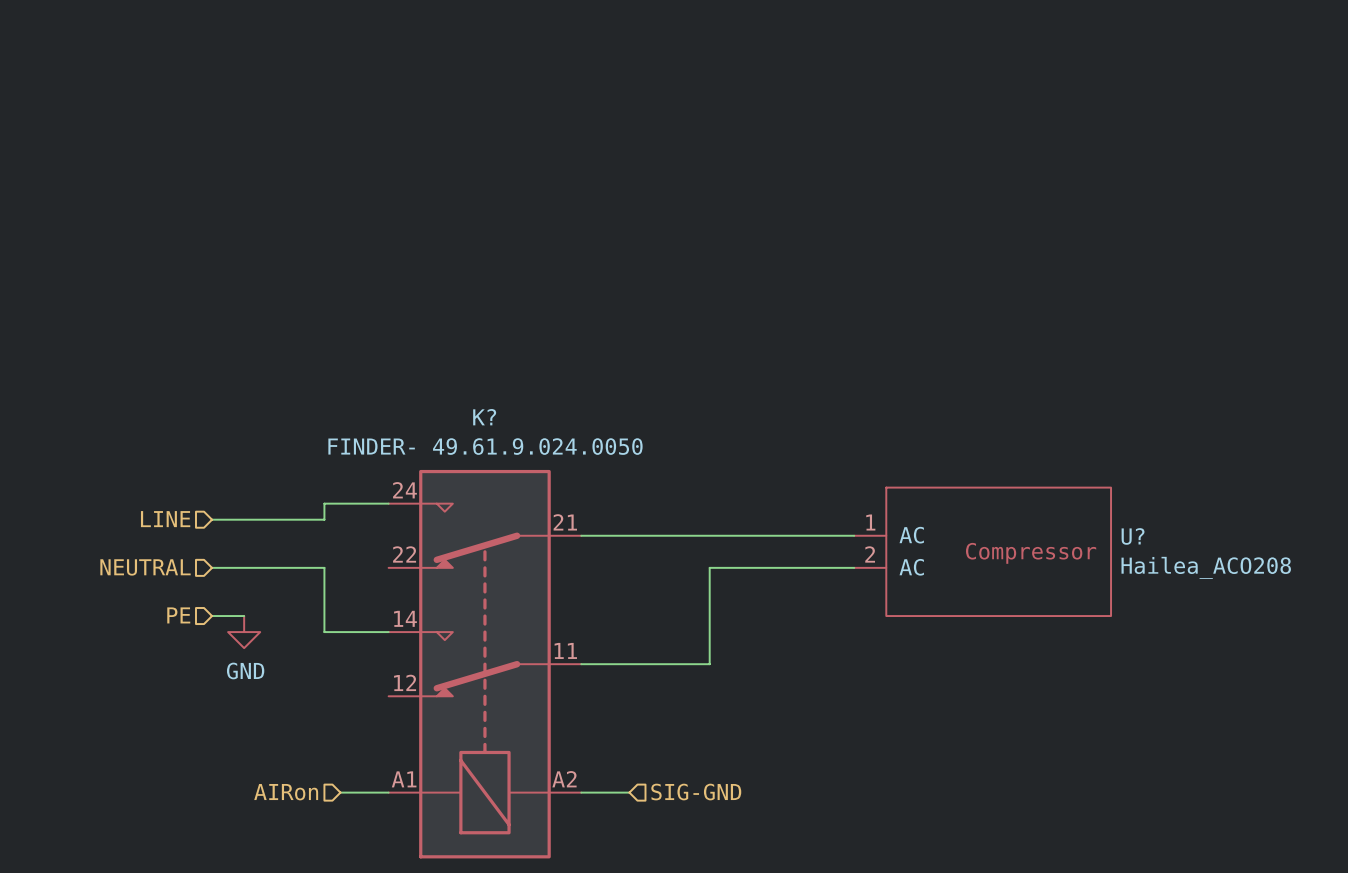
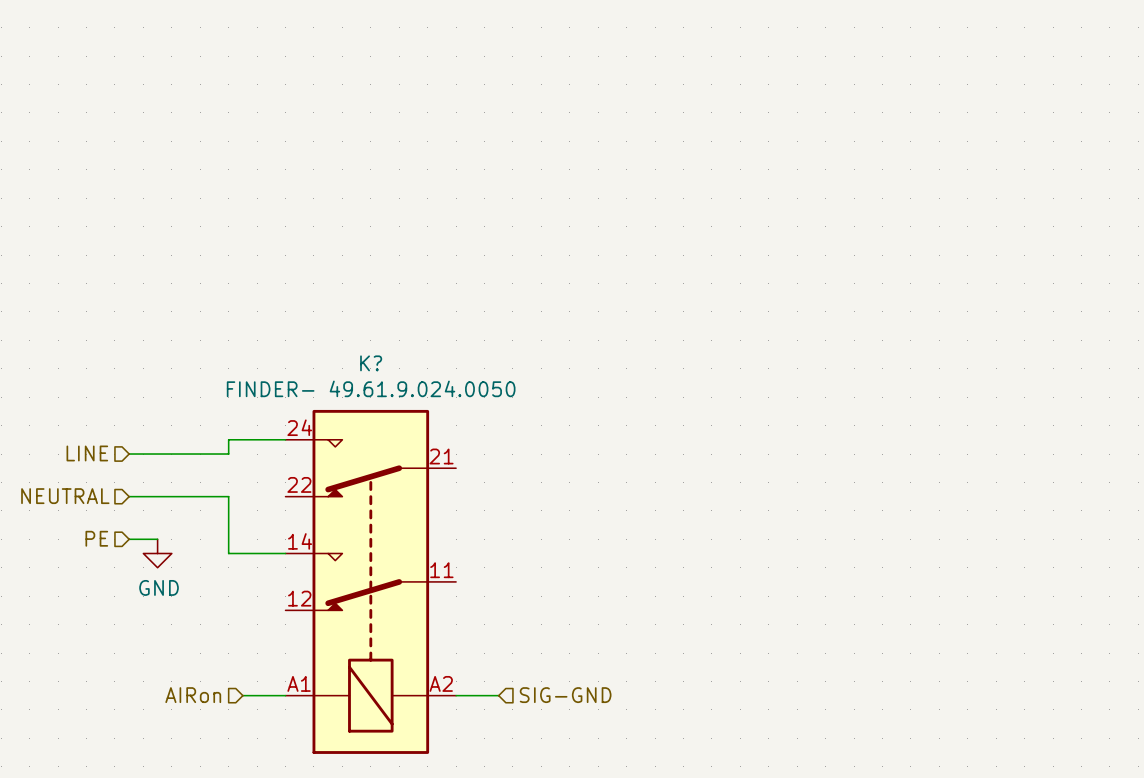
wire: (581, 535) (854, 535) -> none
U?: Hailea_ACO208 (982, 551) -> none
wire: (854, 567) (709, 567) (709, 664) (581, 664) -> none

